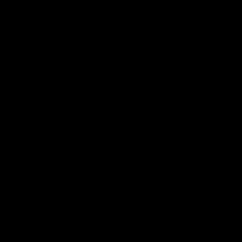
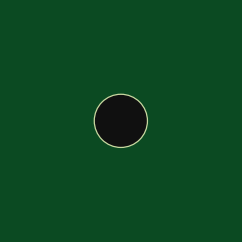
part: none -> (120, 120)

